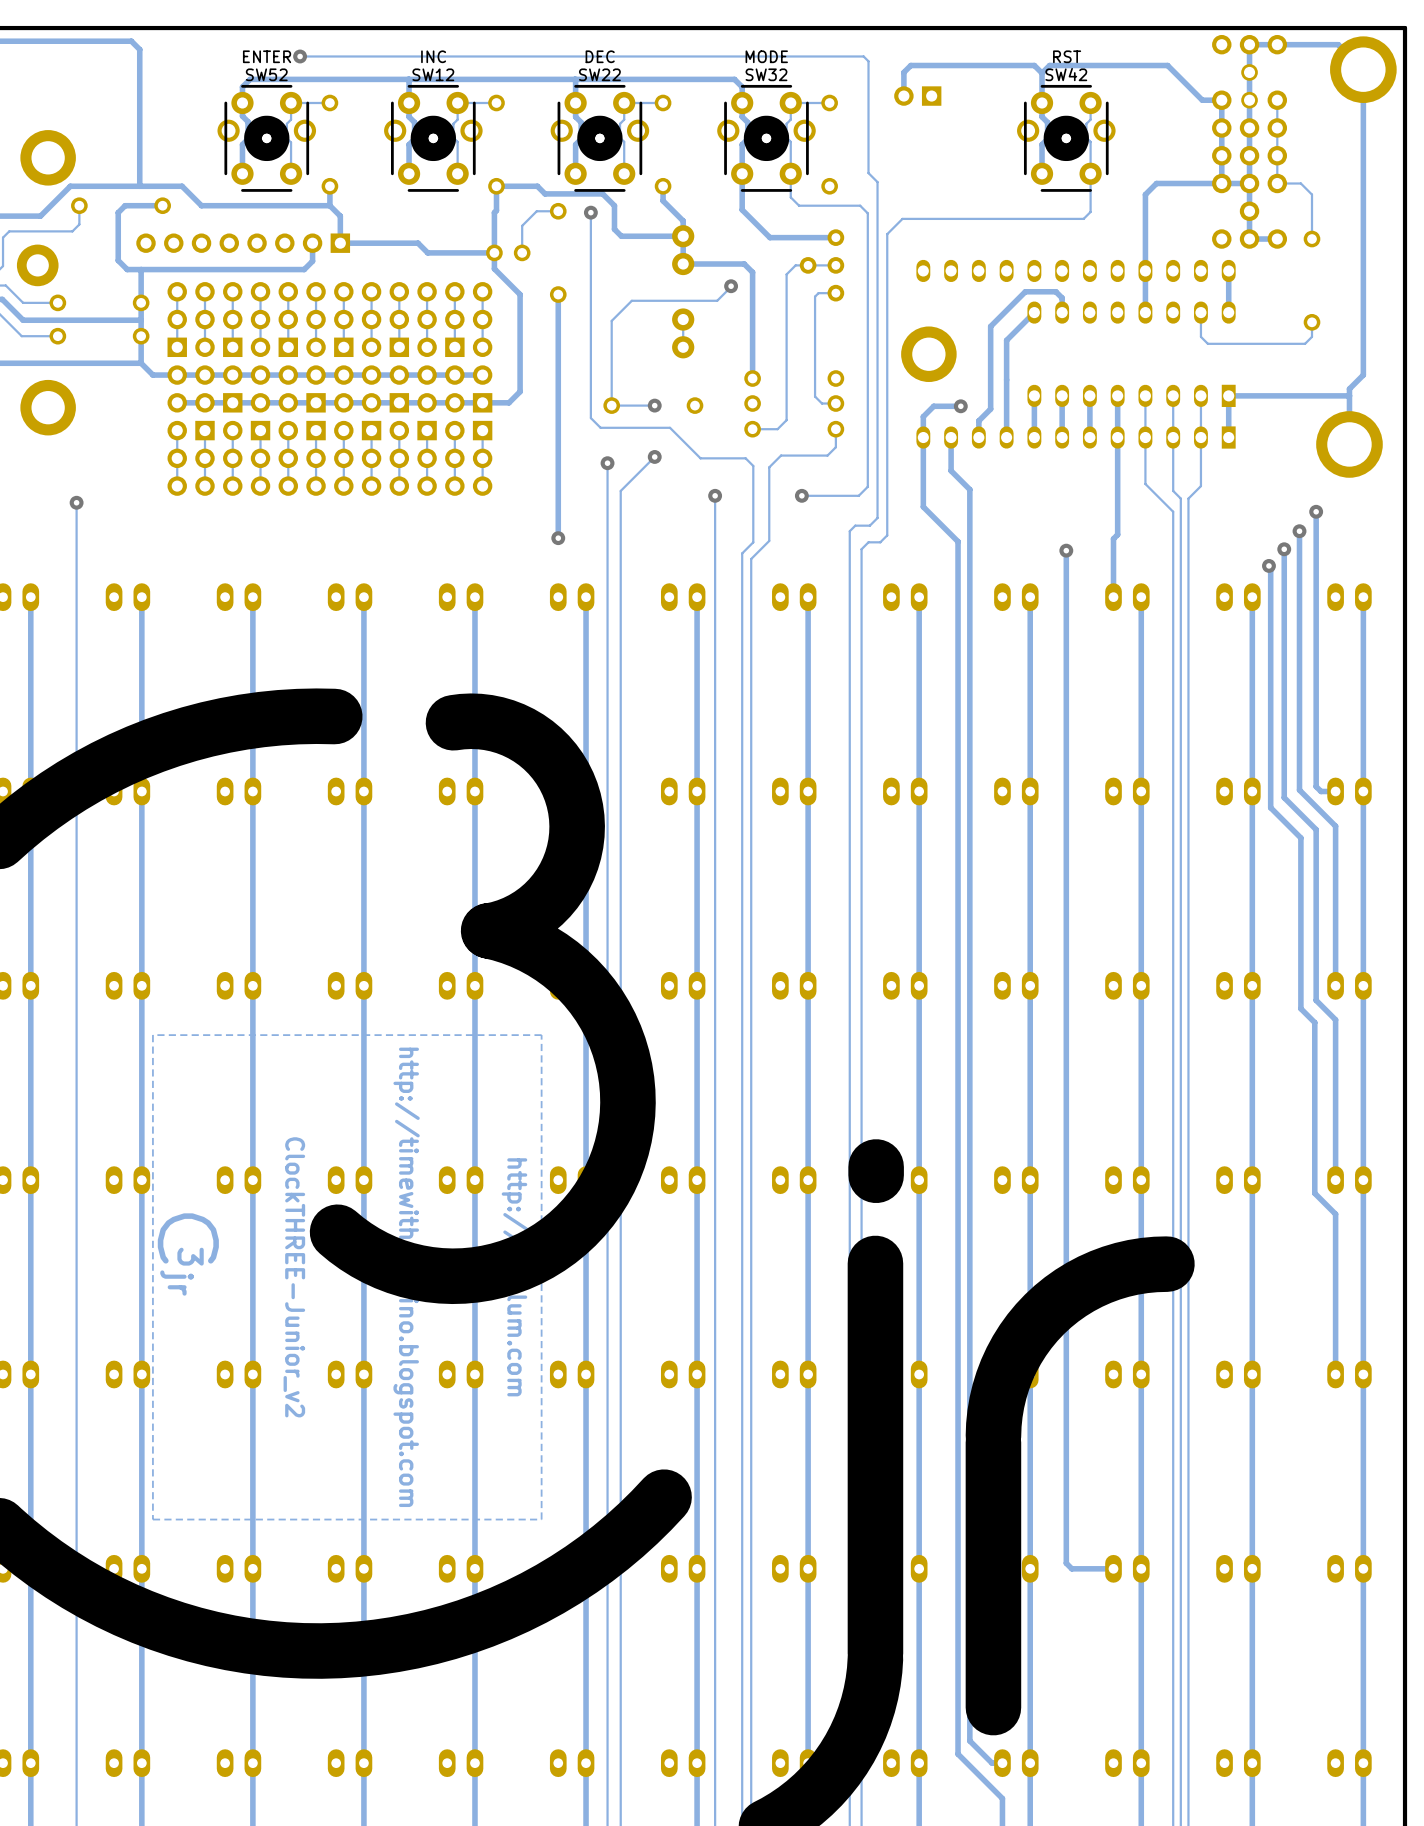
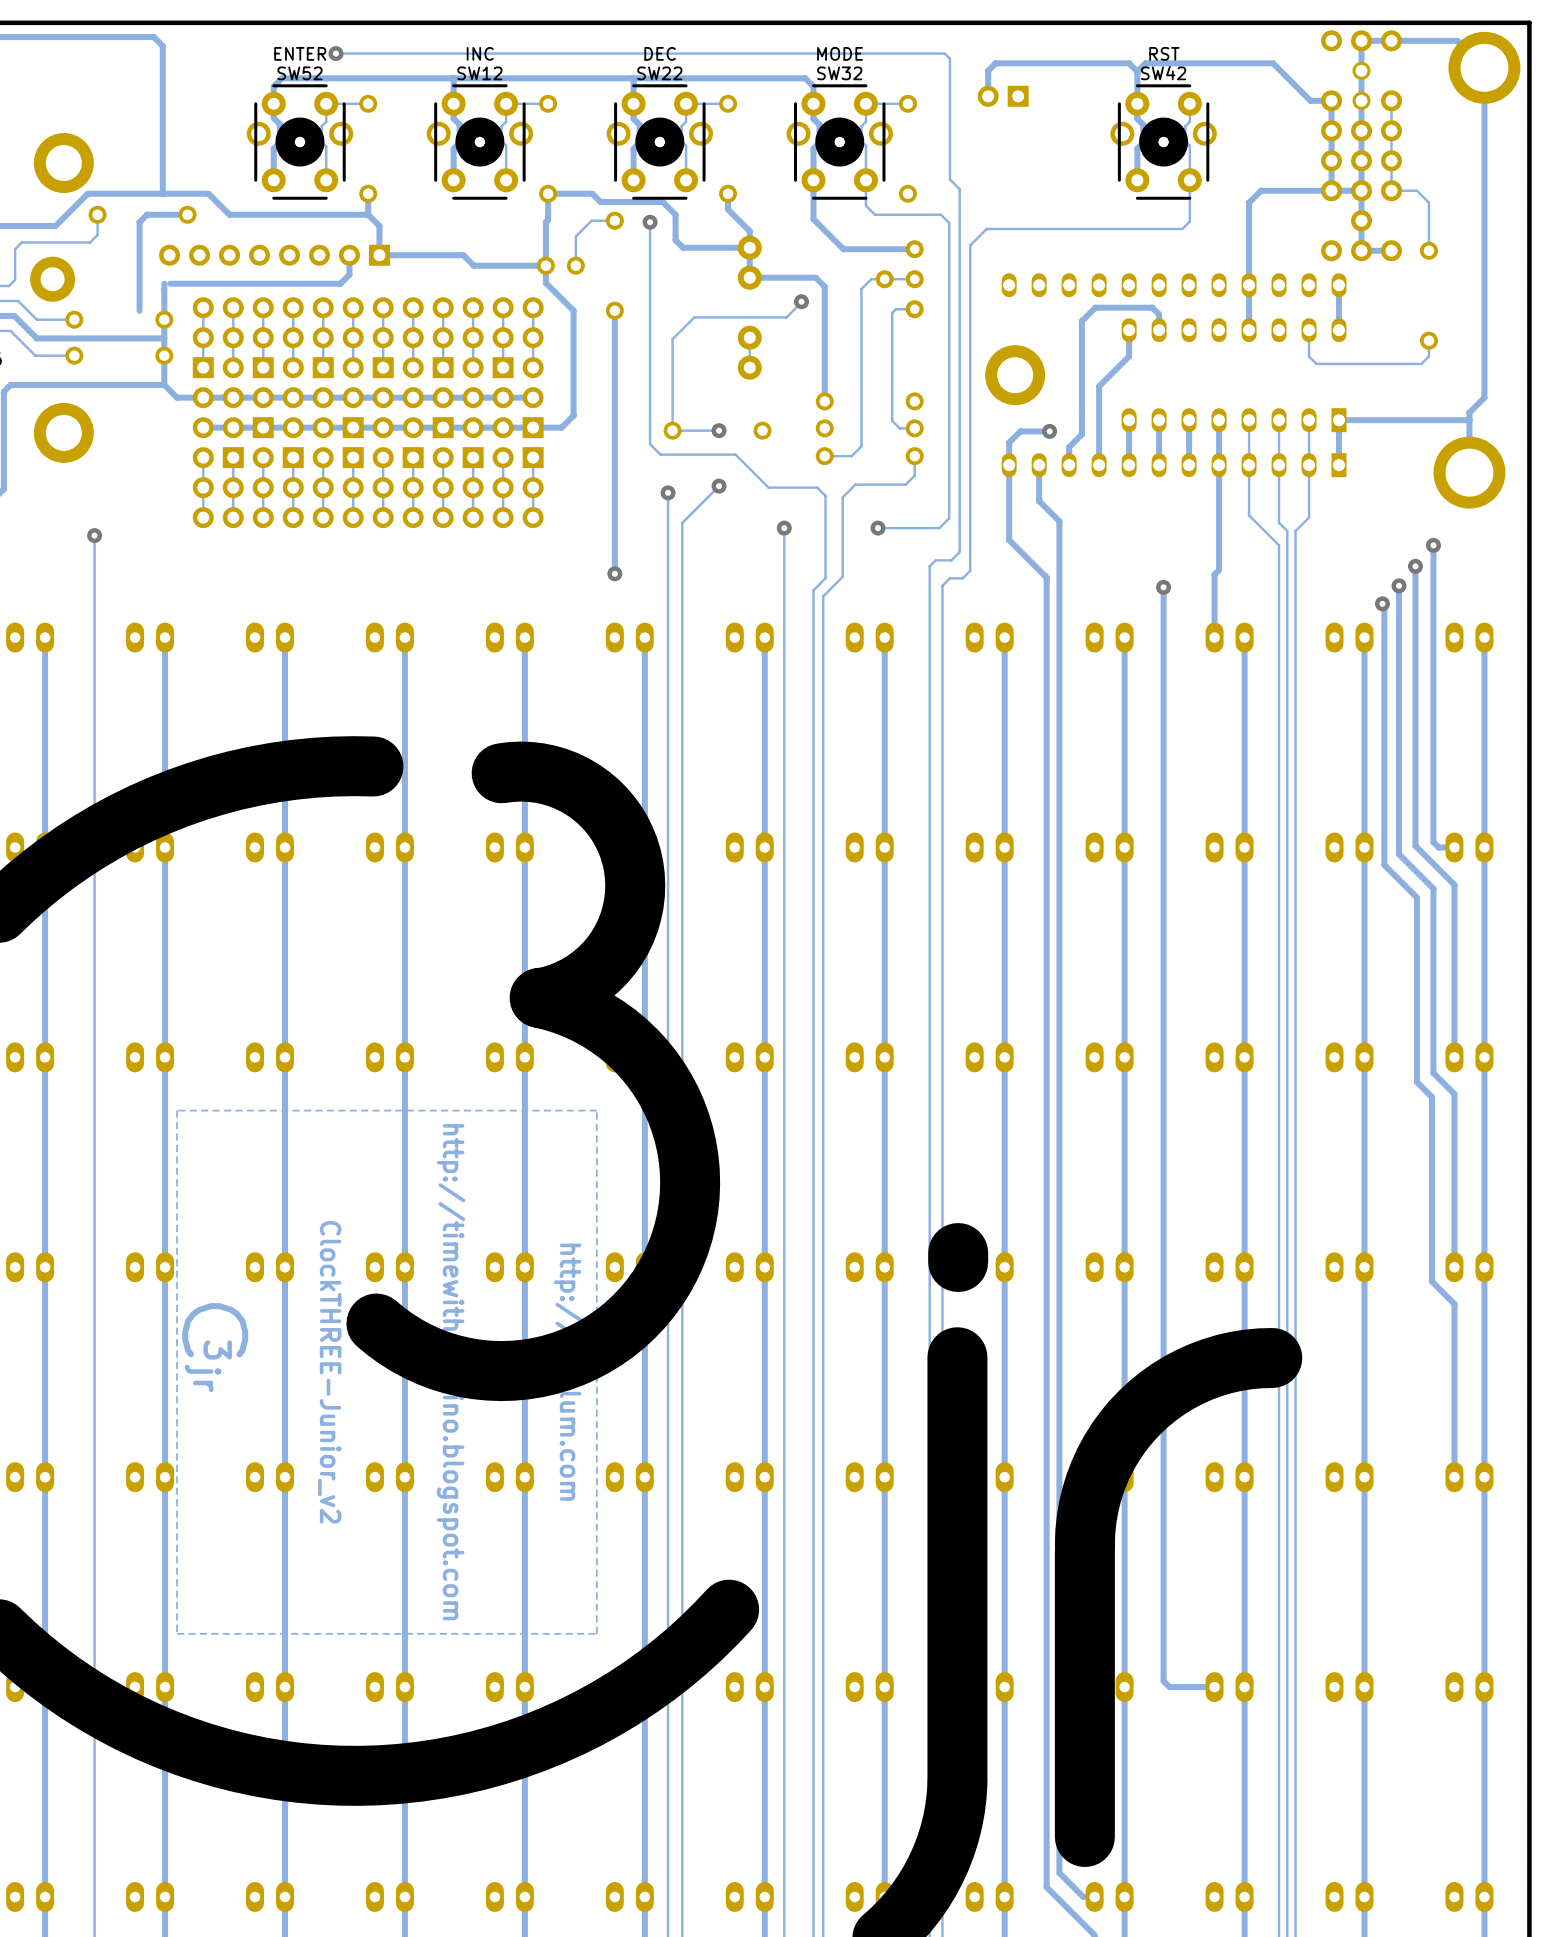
track: (118, 260) (127, 269) (146, 269) -> (139, 273) (139, 310)
track: (1025, 291) (990, 326) -> (1119, 307) (1095, 307) (1081, 321) (1081, 345)
track: (1034, 312) (1006, 340) (1006, 364) -> (1129, 330) (1129, 356) (1099, 386)

